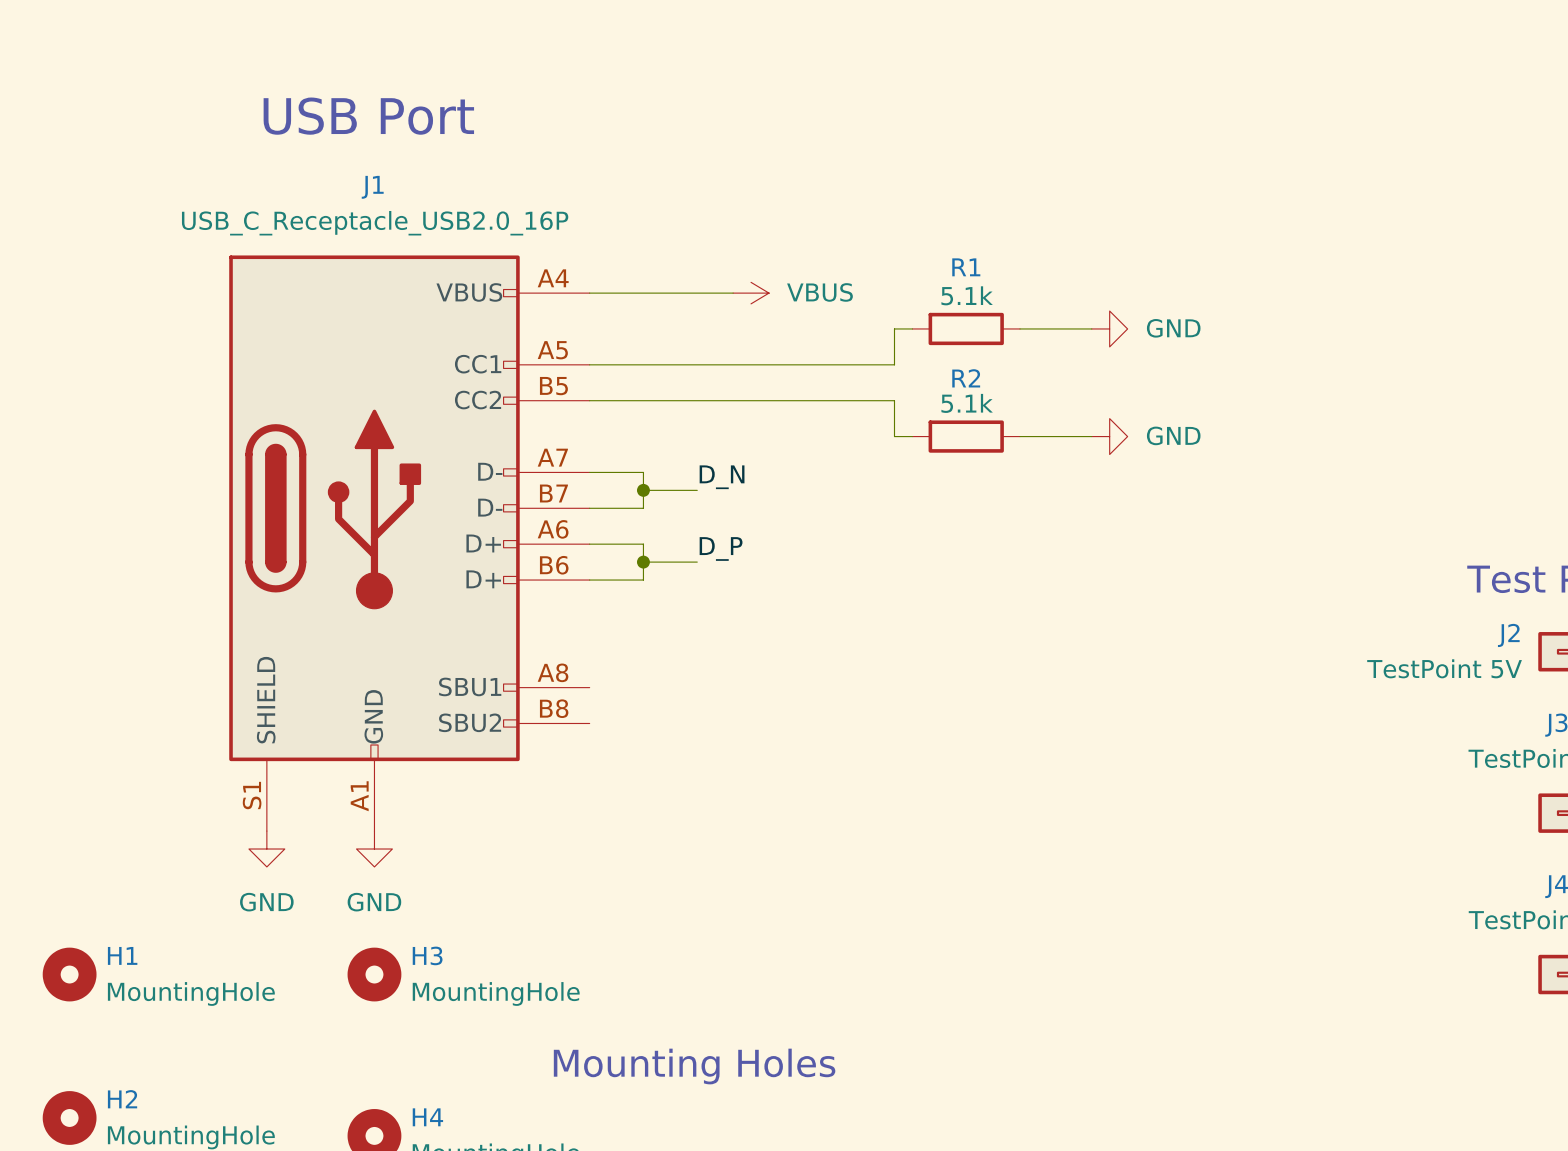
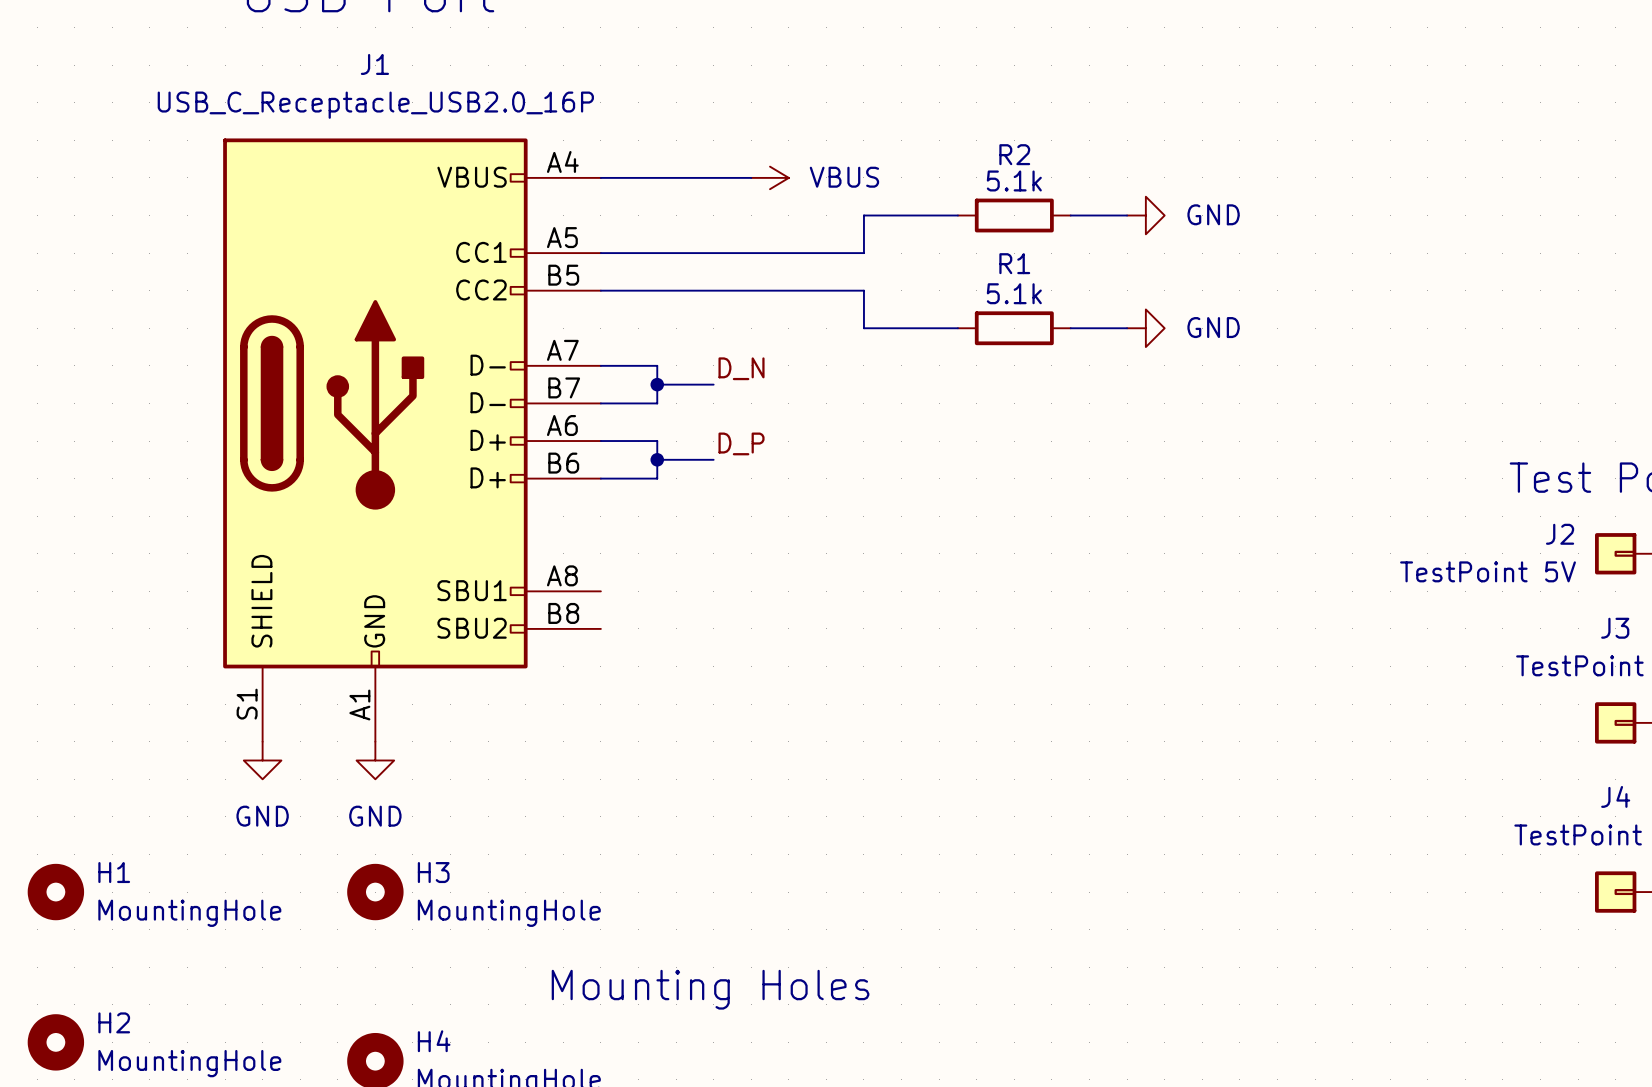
wire: (894, 328) (894, 364) (840, 364) -> (920, 215) (863, 215) (863, 253)
R1 position: (966, 328) -> (1014, 328)
wire: (840, 400) (894, 400) (894, 436) -> (863, 290) (863, 328) (920, 328)
R2 position: (966, 436) -> (1014, 215)

